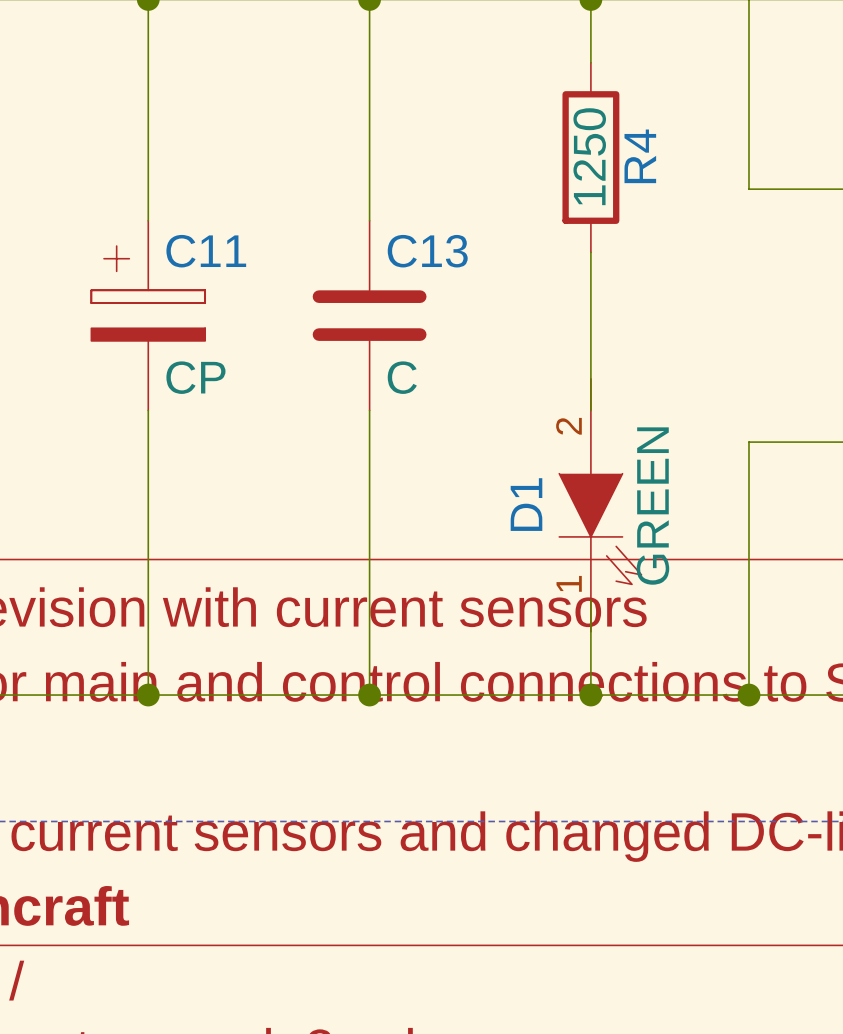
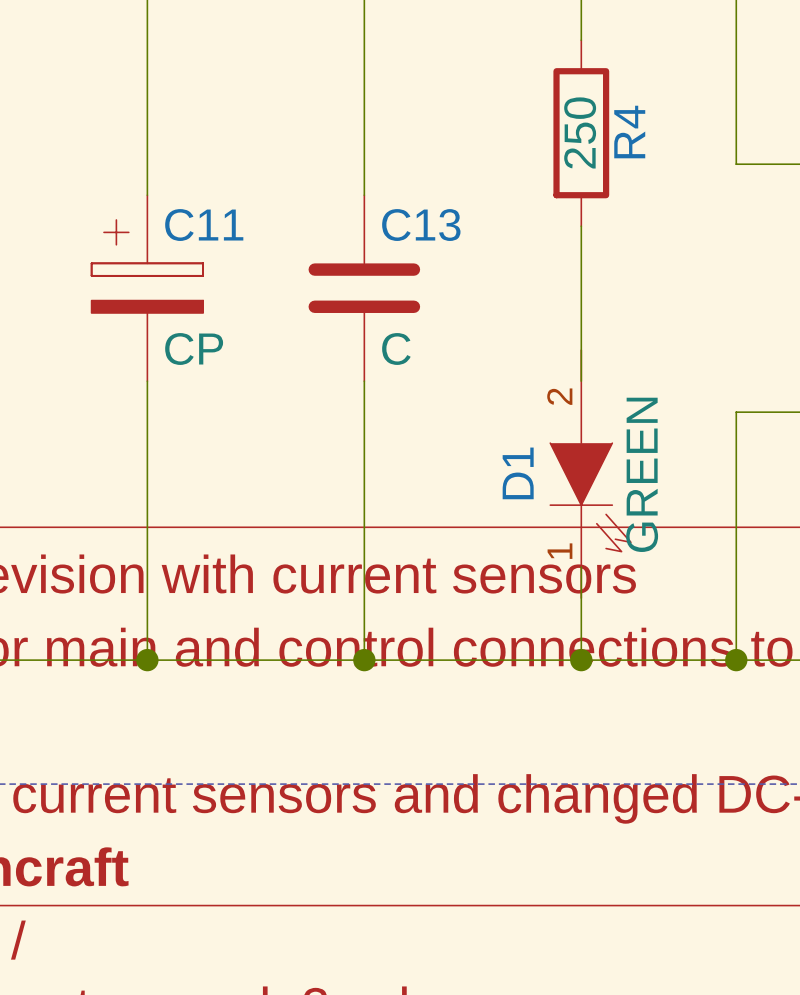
R4 value: 1250 (589, 156) -> 250 (580, 132)

